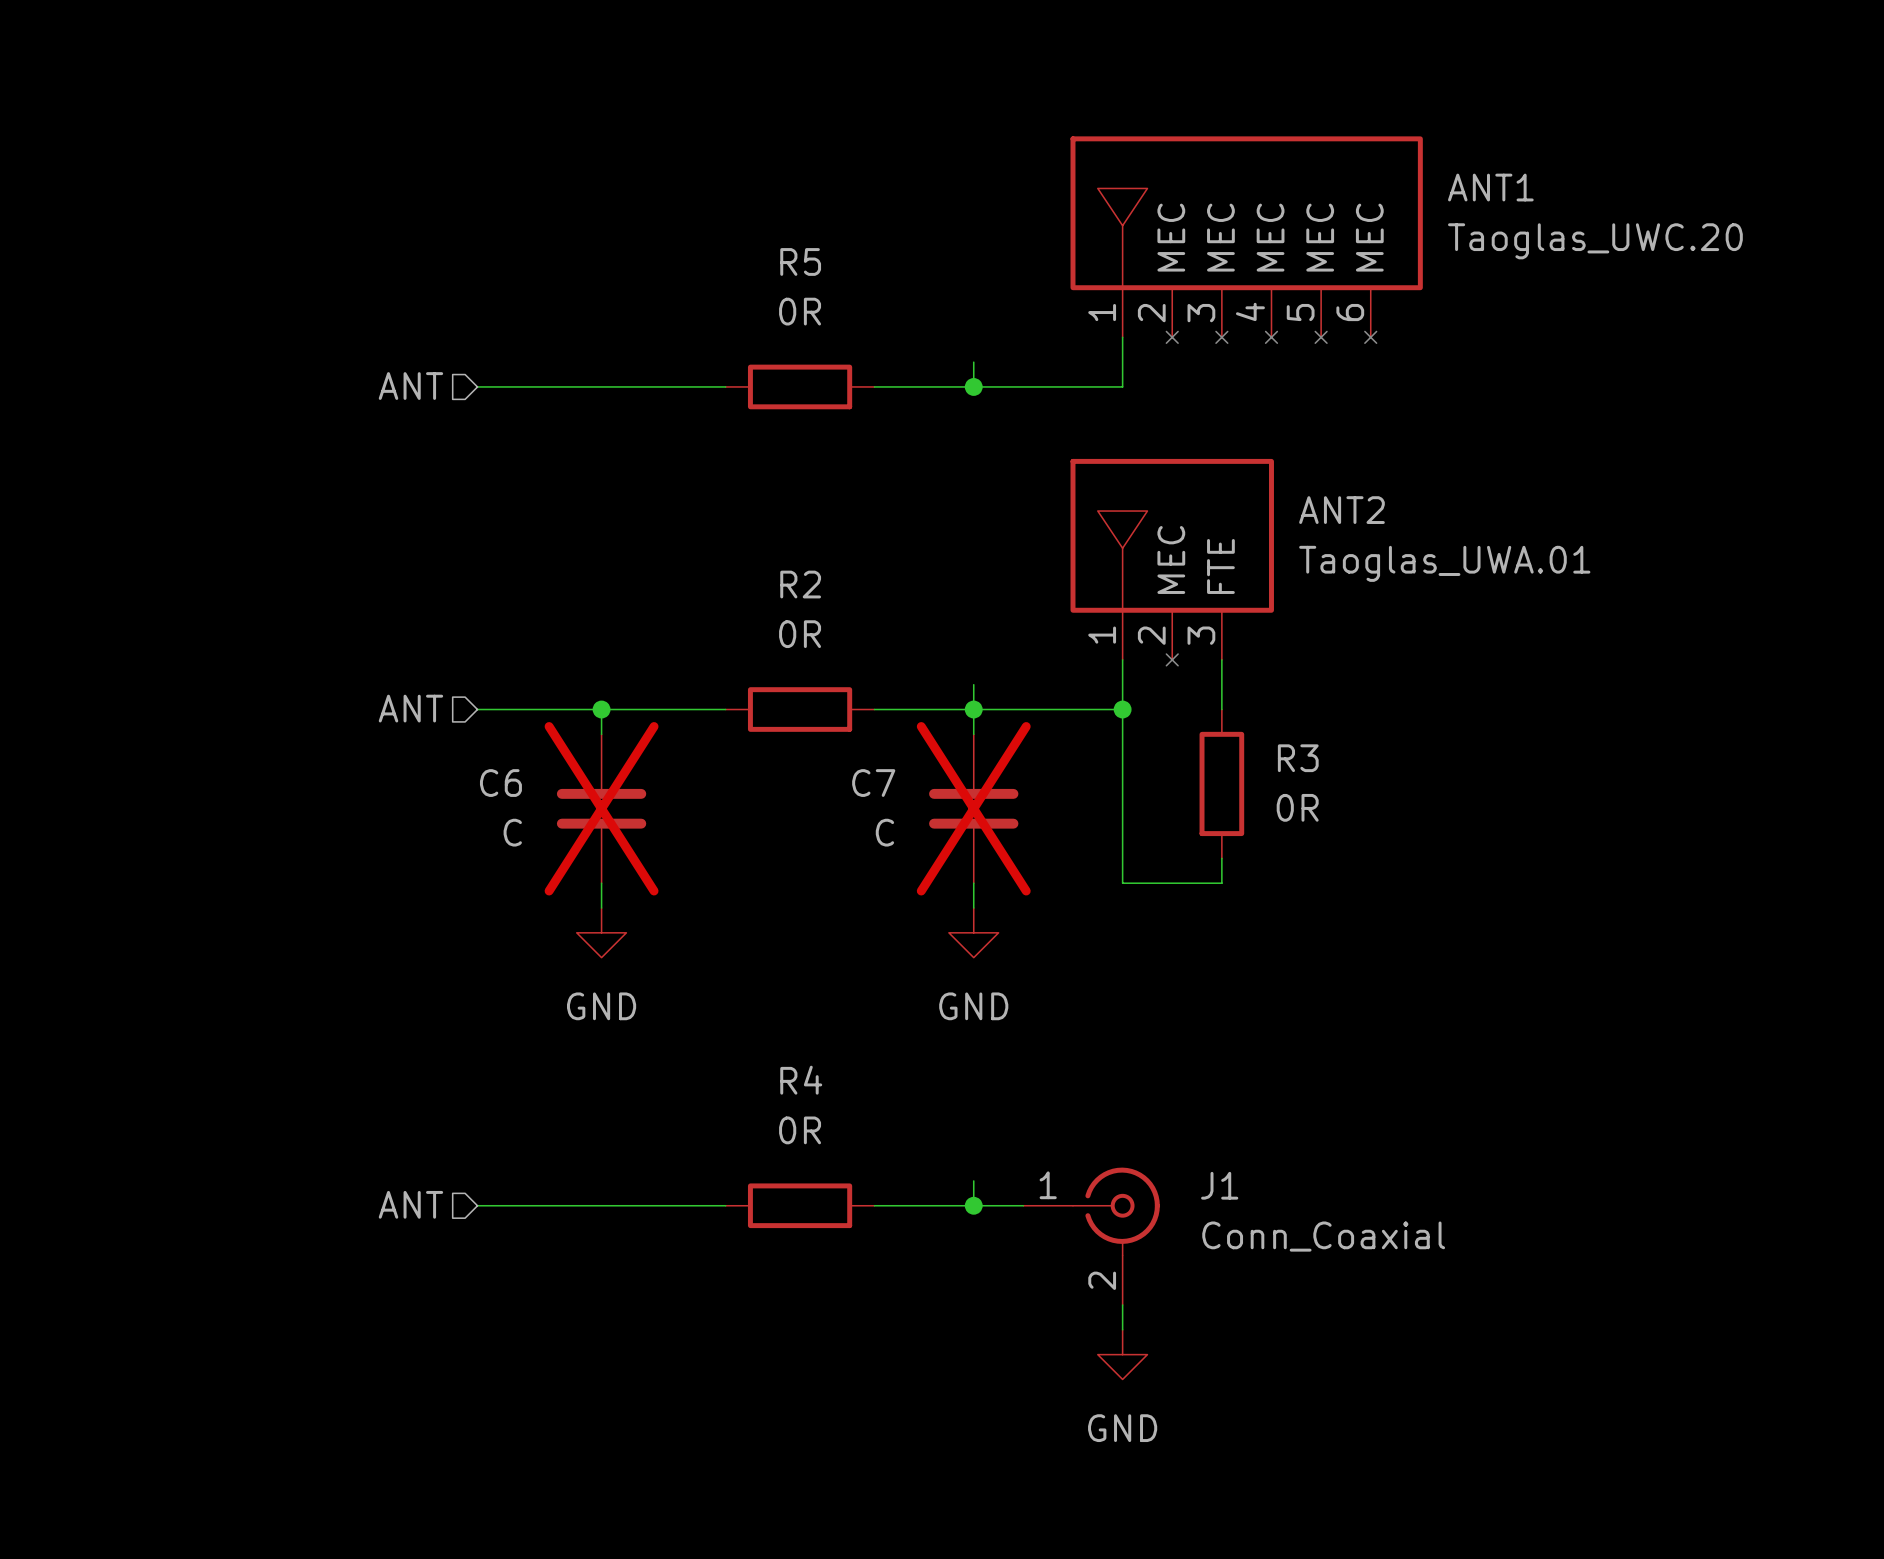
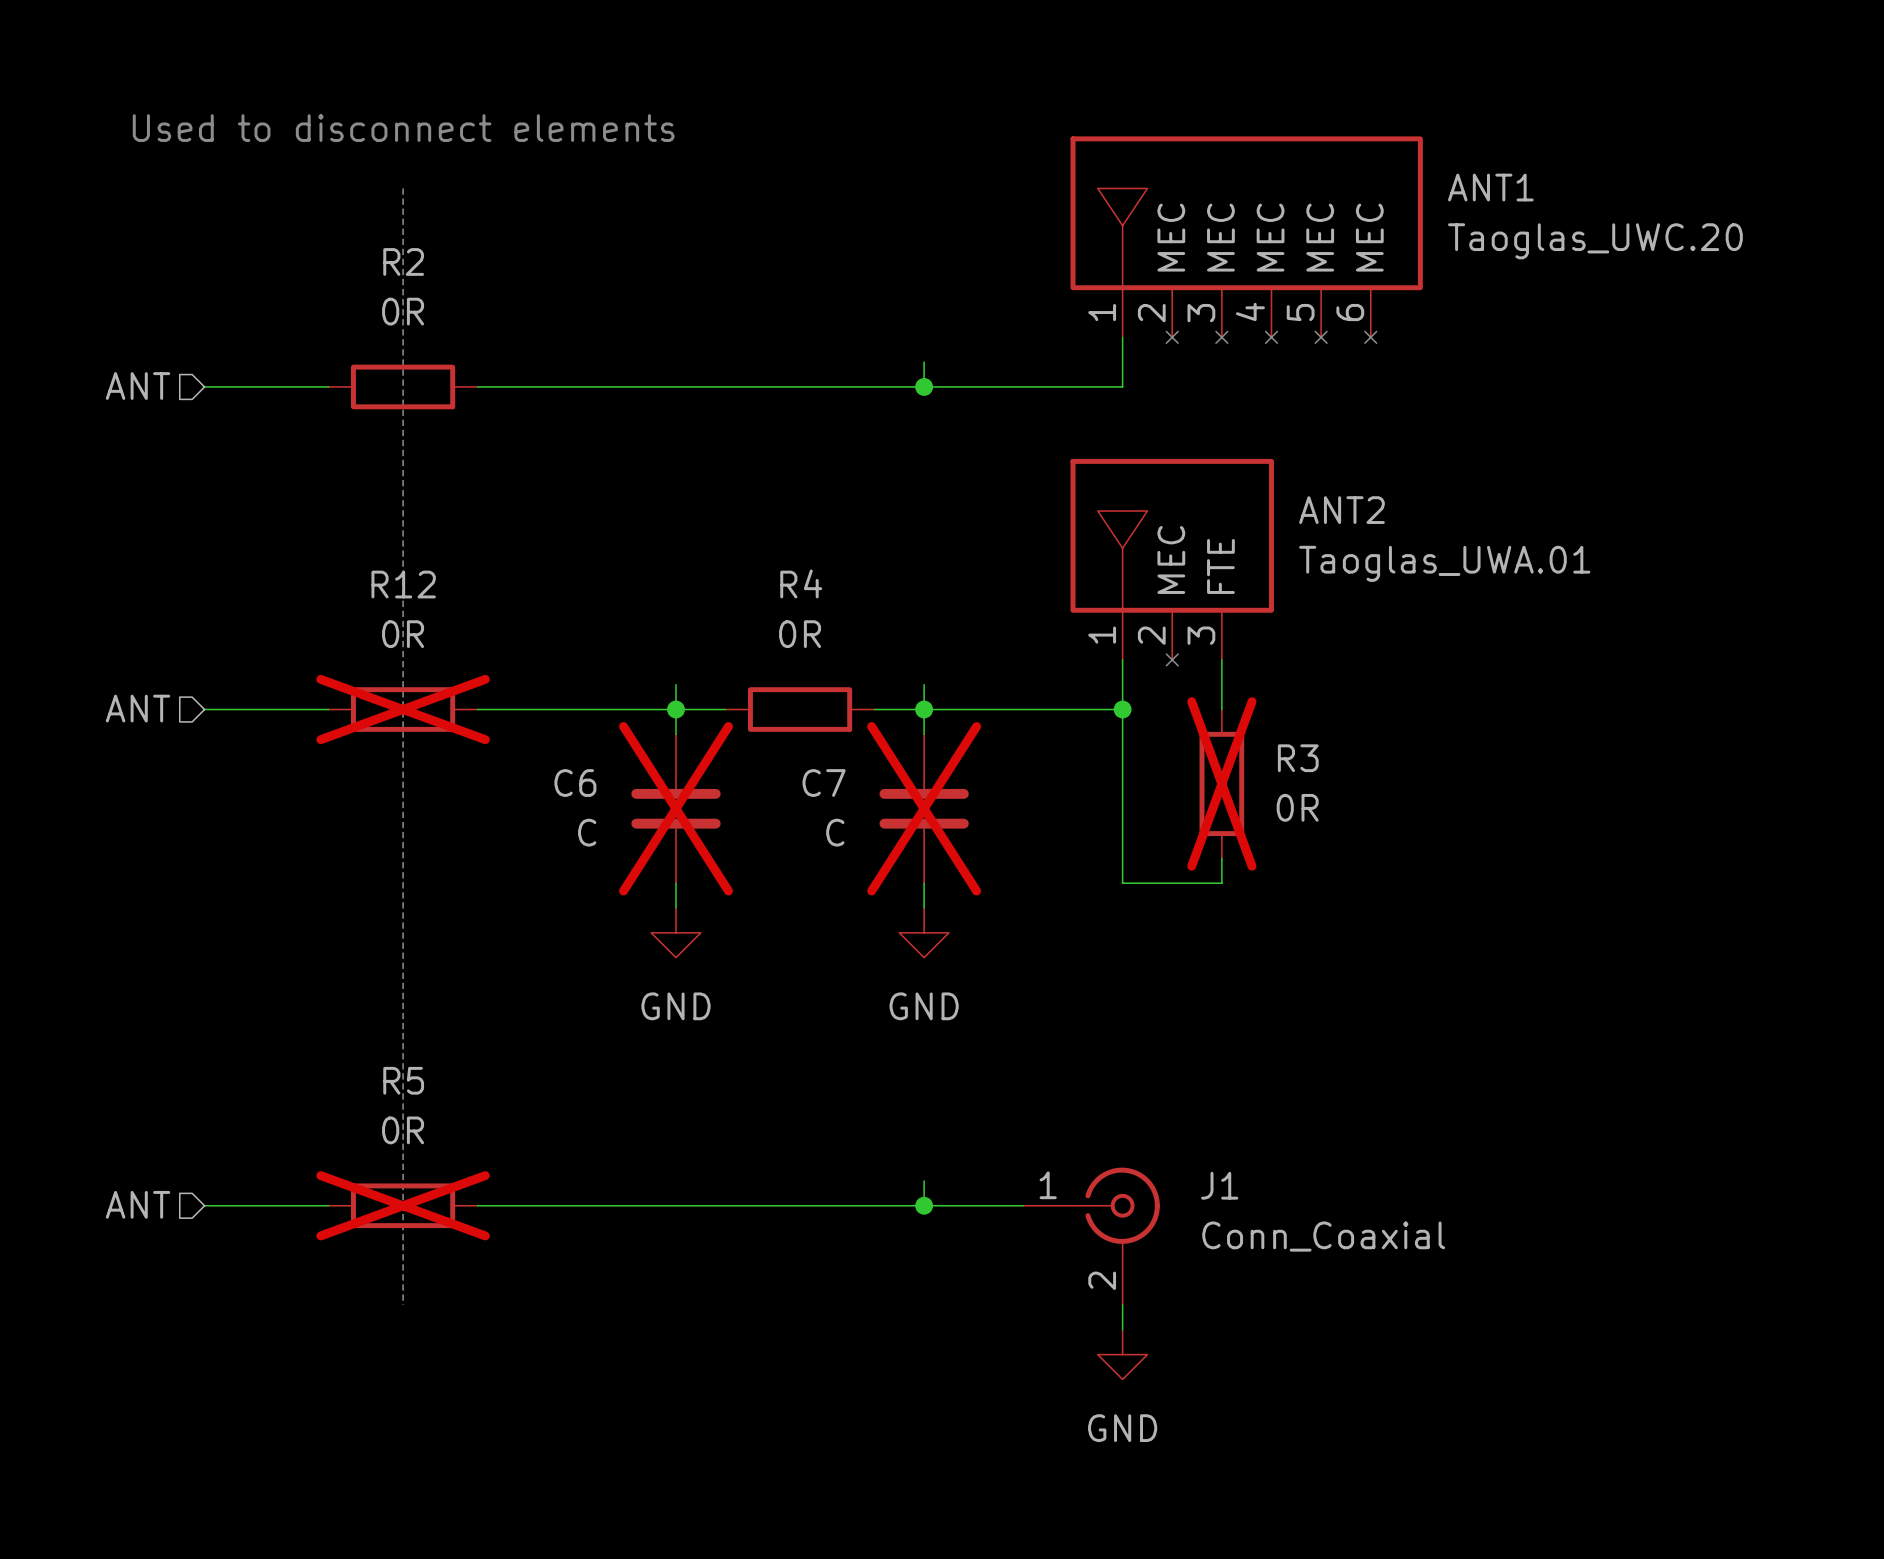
text: none -> Used to disconnect elements (403, 128)
line: none -> (403, 188) (403, 1305)
wire: (973, 362) (973, 386) -> (924, 362) (924, 386)
hierarchical label: none -> ANT (138, 386)
wire: none -> (204, 386) (328, 386)
R2: none -> 0R (403, 386)
hierarchical label: ANT (410, 386) -> none
wire: none -> (725, 386) (874, 386)
R5 position: (800, 386) -> (403, 1205)
junction position: (973, 386) -> (924, 386)
R2 name: R2 (800, 584) -> R4 (801, 583)
wire: none -> (676, 684) (676, 734)
wire: (973, 684) (973, 734) -> (924, 684) (924, 734)
hierarchical label: none -> ANT (138, 708)
hierarchical label: ANT (410, 708) -> none
wire: none -> (204, 709) (328, 709)
R12: none -> 0R (403, 709)
wire: (601, 709) (601, 734) -> none
junction position: (601, 709) -> (676, 709)
junction position: (973, 709) -> (924, 709)
R3 do-not-place cross: none -> (1221, 783)
C6 position: (601, 808) -> (676, 808)
C7 position: (973, 808) -> (924, 808)
wire: (601, 883) (601, 908) -> (676, 883) (676, 908)
wire: (973, 883) (973, 908) -> (924, 883) (924, 908)
power symbol position: GND (601, 932) -> GND (676, 932)
power symbol position: GND (973, 932) -> GND (924, 932)
wire: (973, 1180) (973, 1205) -> (924, 1180) (924, 1205)
hierarchical label position: ANT (410, 1204) -> ANT (138, 1204)
wire: none -> (204, 1205) (328, 1205)
R5 do-not-place cross: none -> (403, 1205)
wire: none -> (725, 1205) (874, 1205)
R4: 0R (800, 1205) -> none
junction position: (973, 1205) -> (924, 1205)

